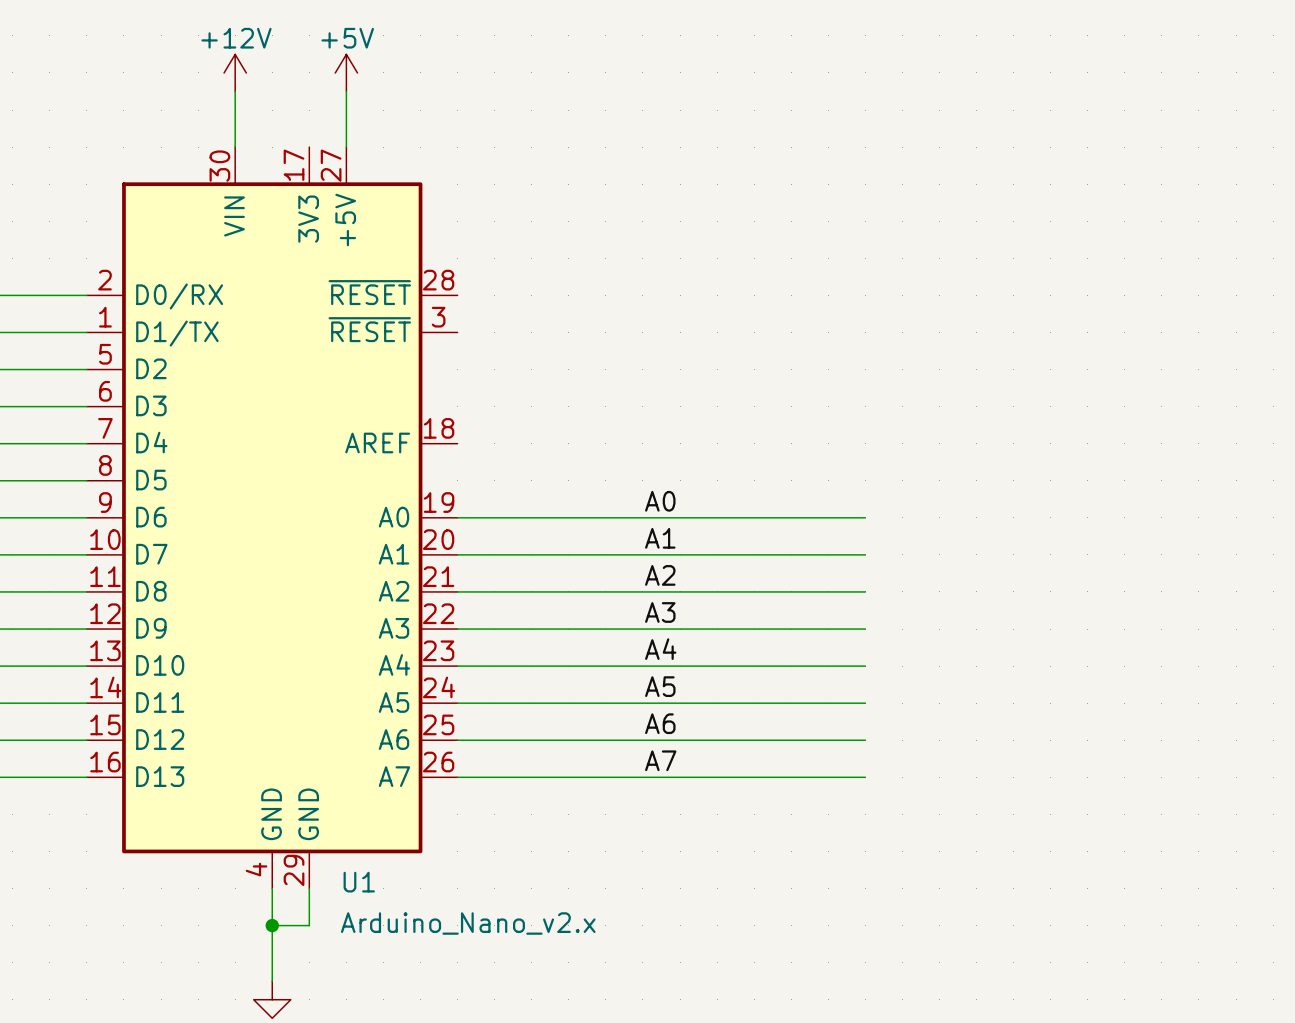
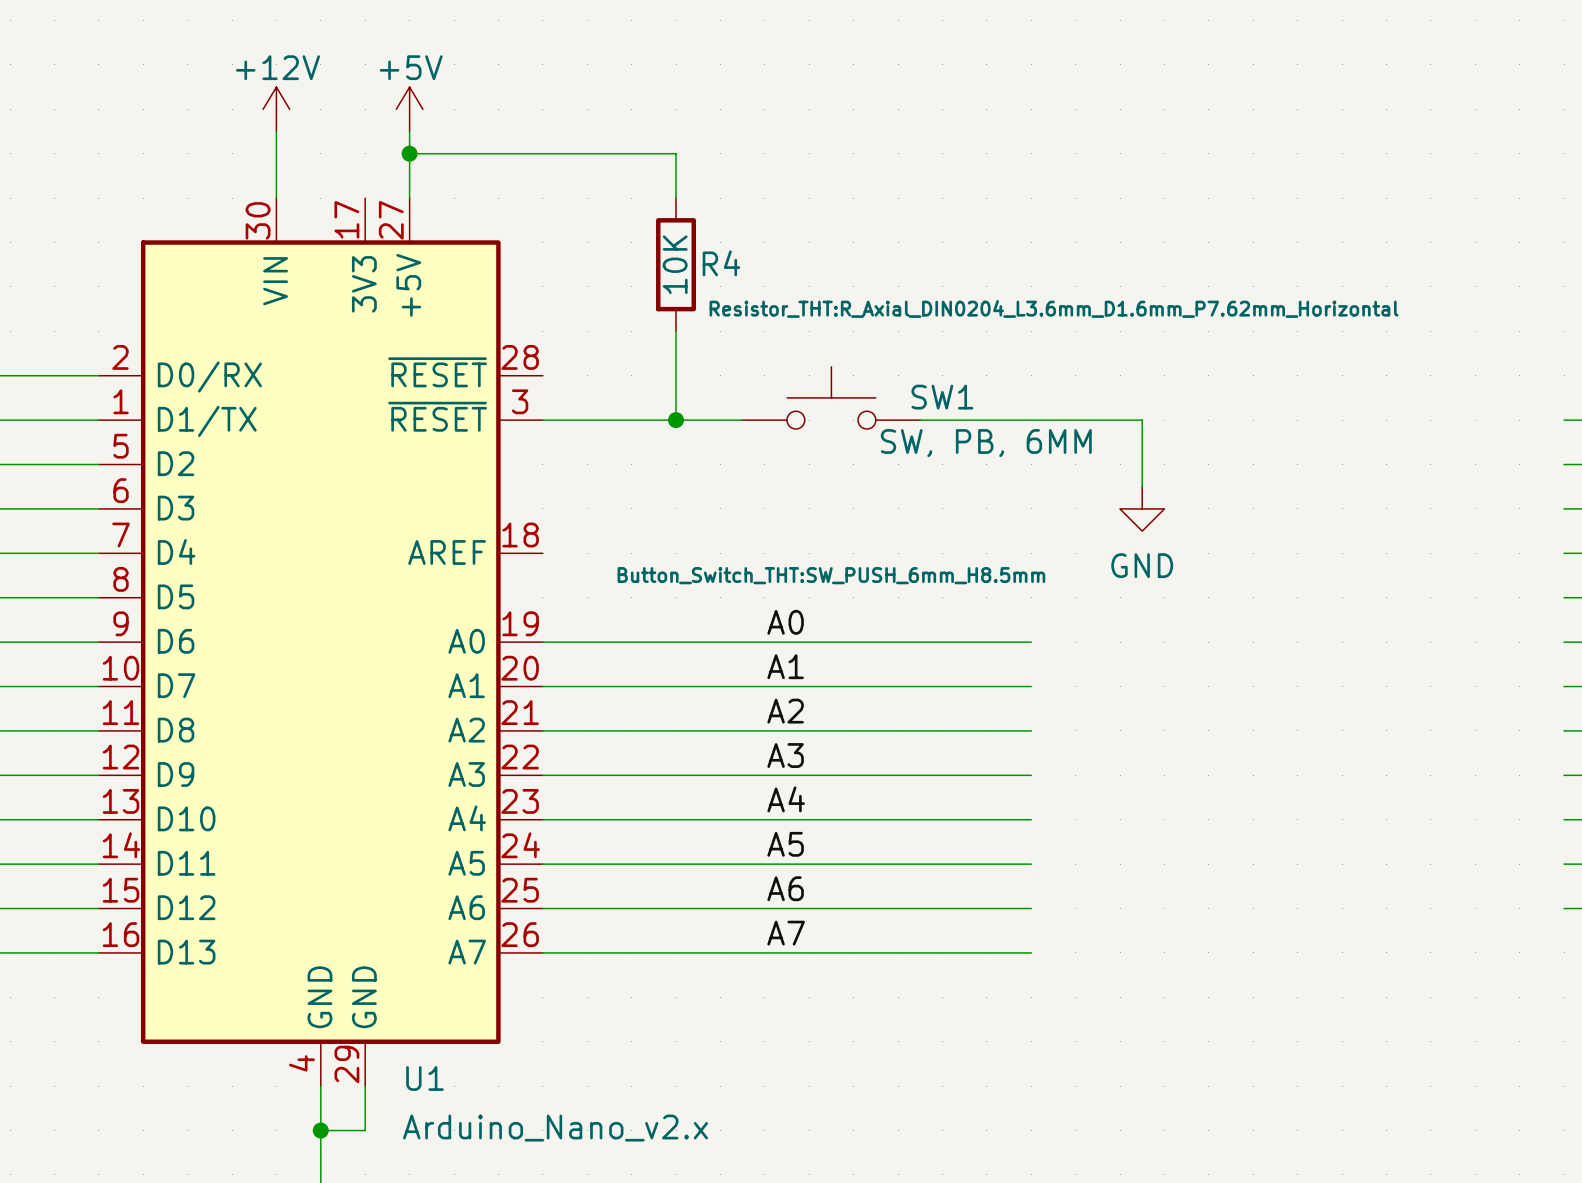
wire: none -> (409, 153) (676, 153) (676, 198)
junction: none -> (409, 153)
R4: none -> 10K (676, 264)
wire: none -> (676, 331) (676, 420)
SW1: none -> SW, PB, 6MM (831, 397)
wire: none -> (542, 420) (742, 420)
junction: none -> (676, 420)
wire: none -> (920, 420) (1142, 420) (1142, 486)
power symbol: none -> GND (1142, 508)

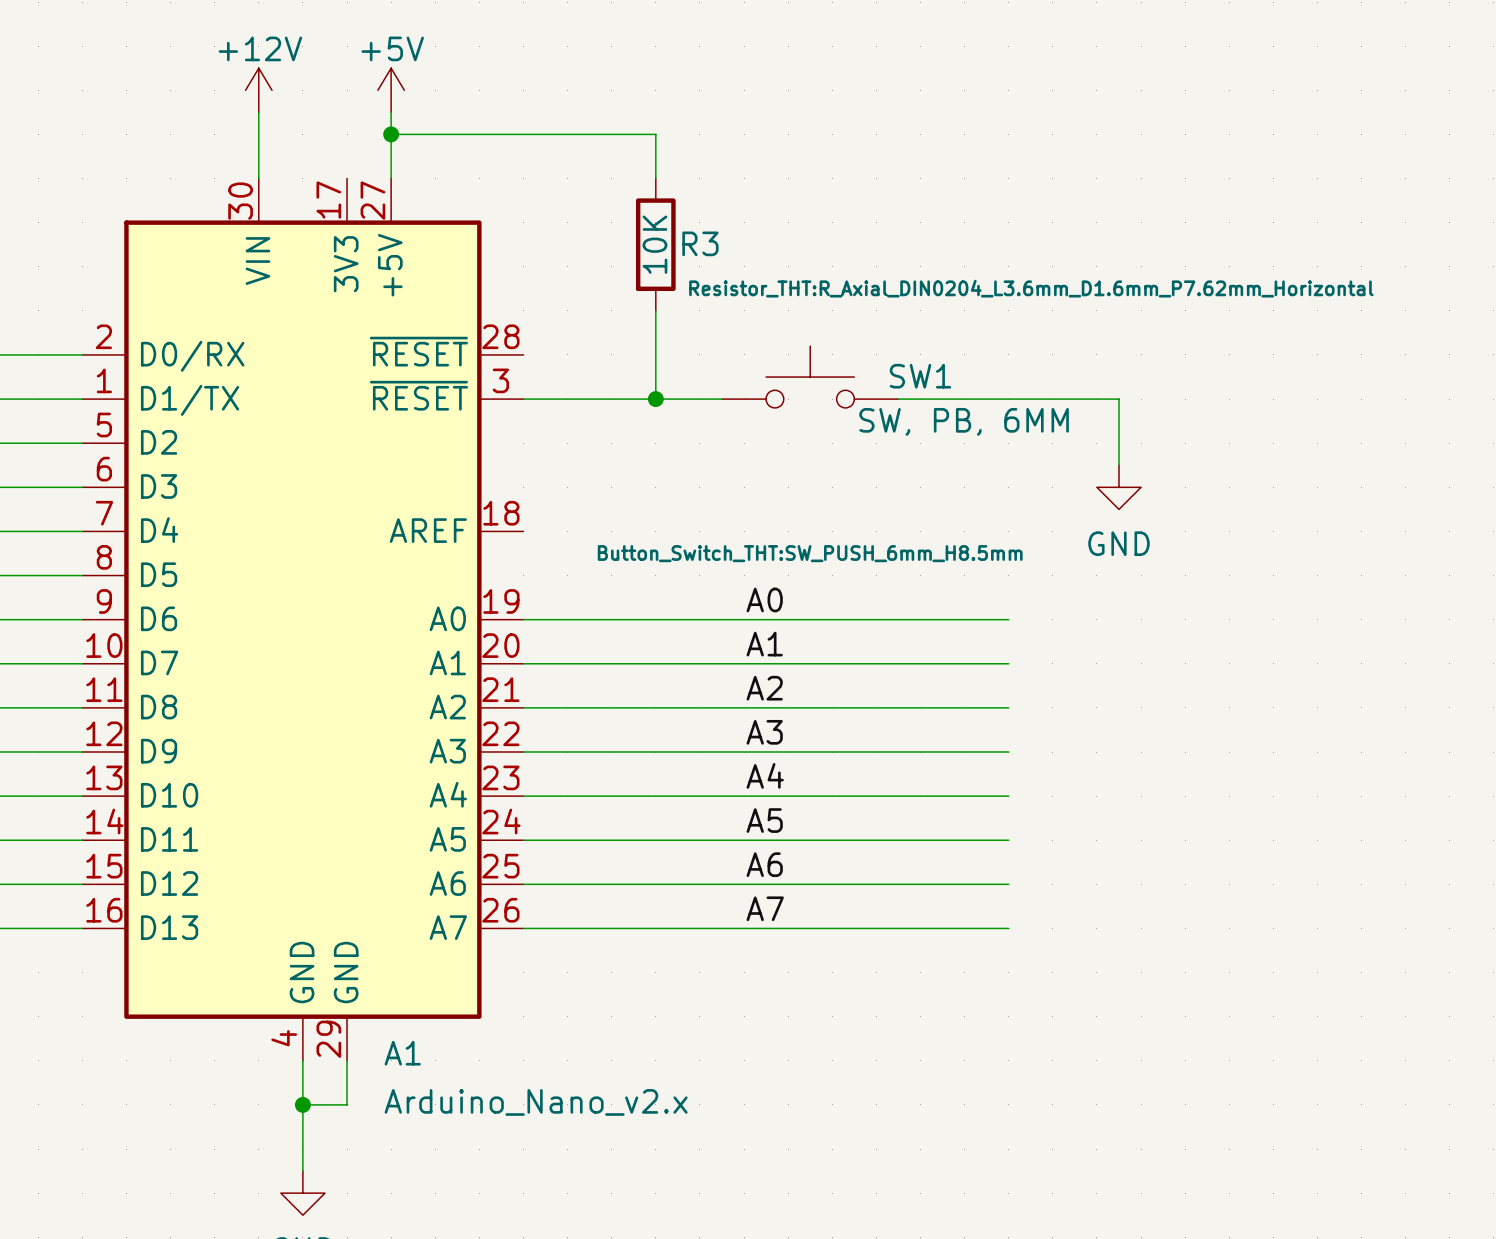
R4 name: R4 (721, 263) -> R3 (700, 243)
U1 name: U1 (424, 1078) -> A1 (402, 1053)

